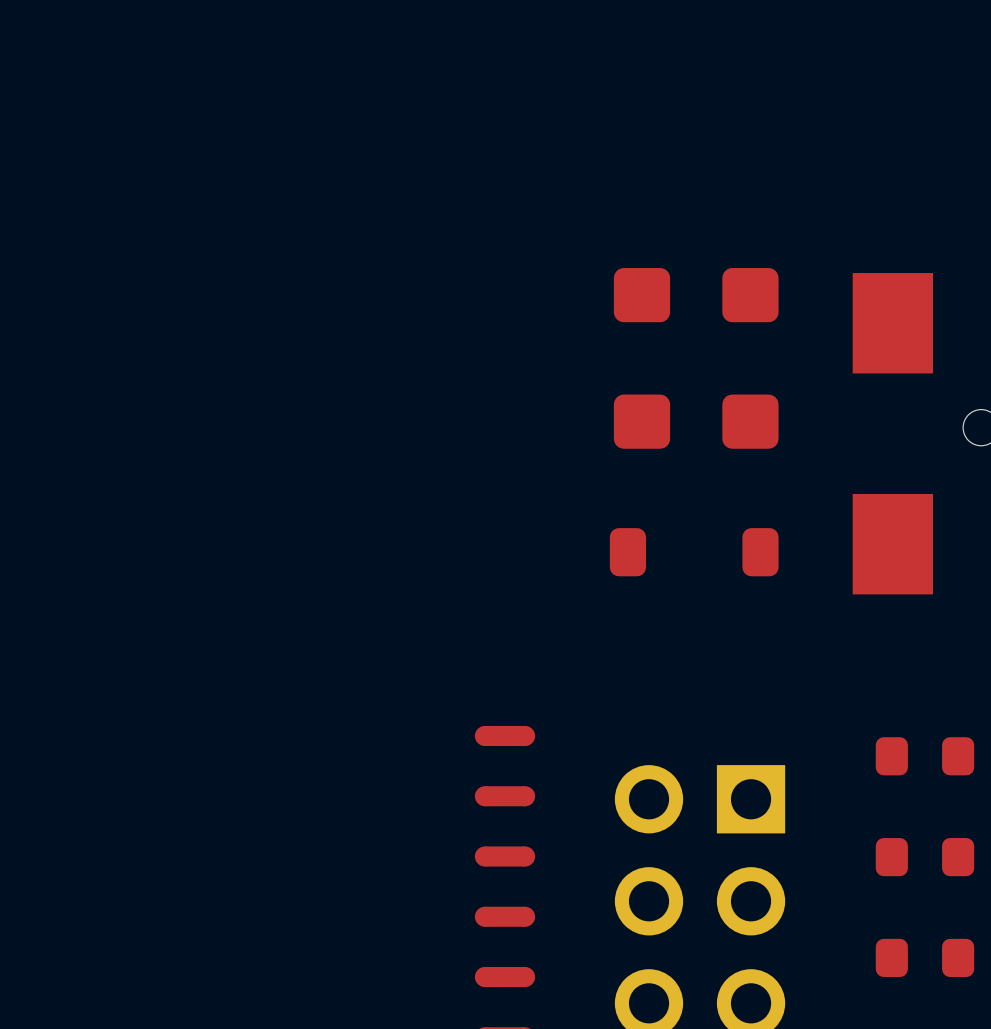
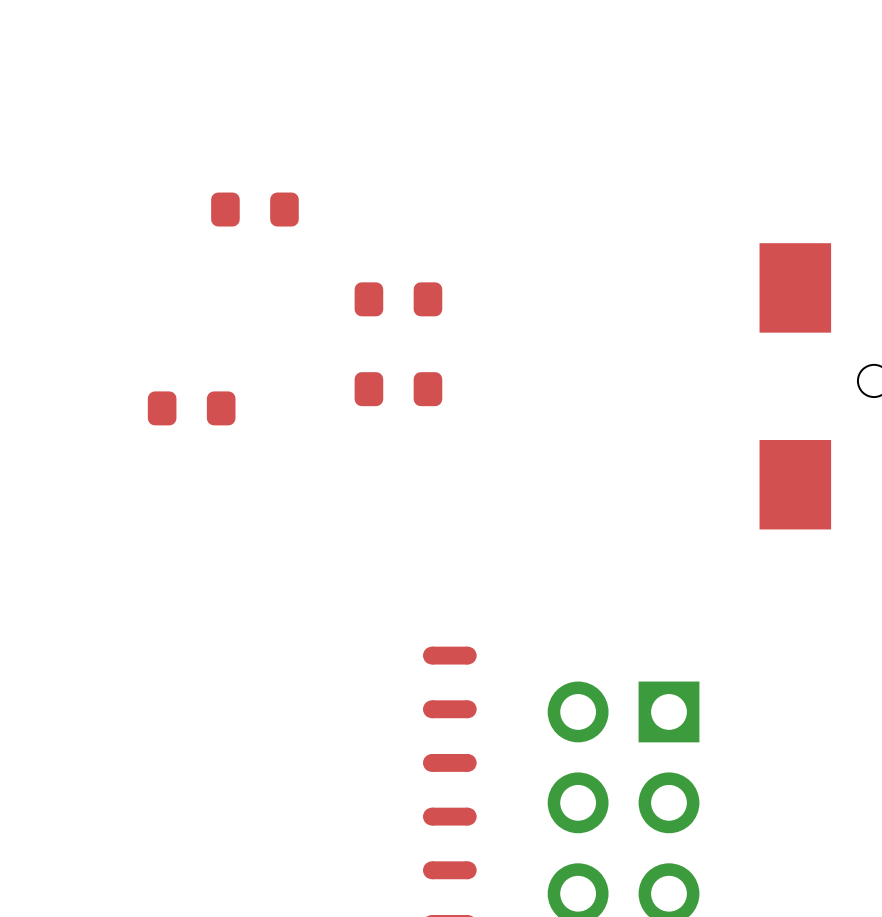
part: none -> (254, 209)
part: (696, 295) -> none
part: none -> (398, 299)
part: (696, 421) -> none
part: none -> (398, 389)
part: none -> (191, 408)
part: (694, 552) -> none
part: (924, 756) -> none
part: (924, 857) -> none
part: (924, 957) -> none

